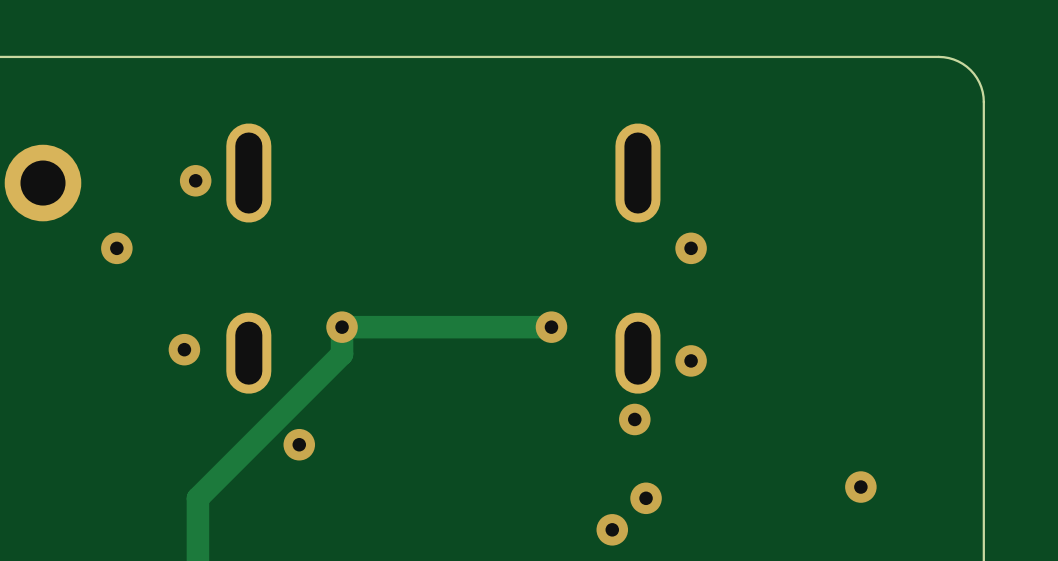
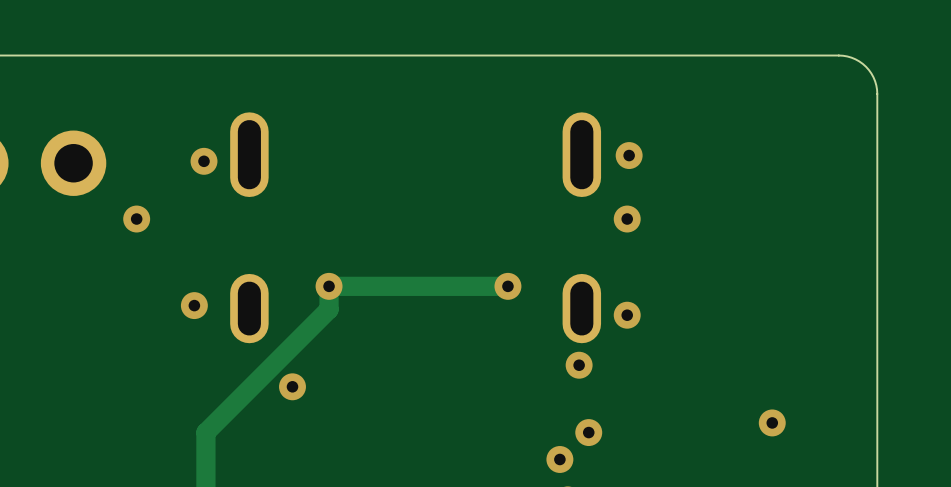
via: none -> (629, 155)

